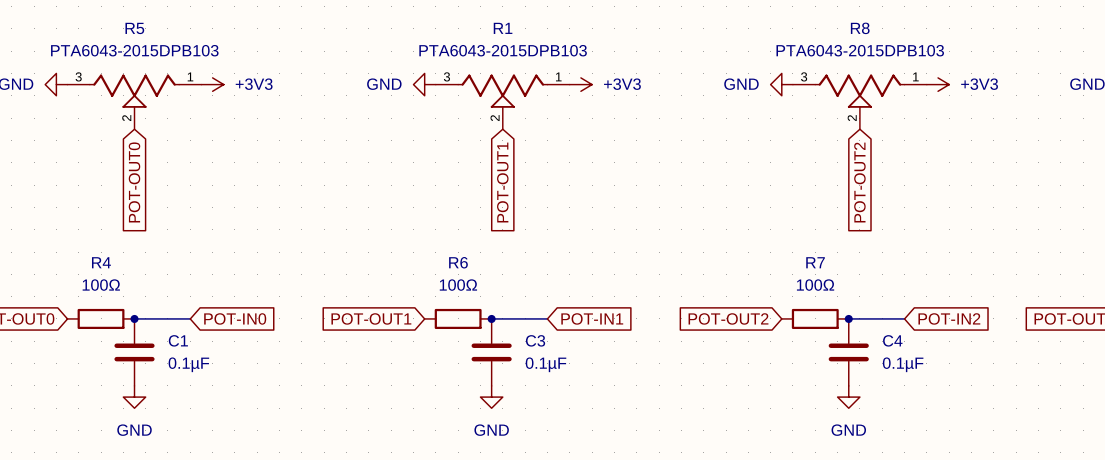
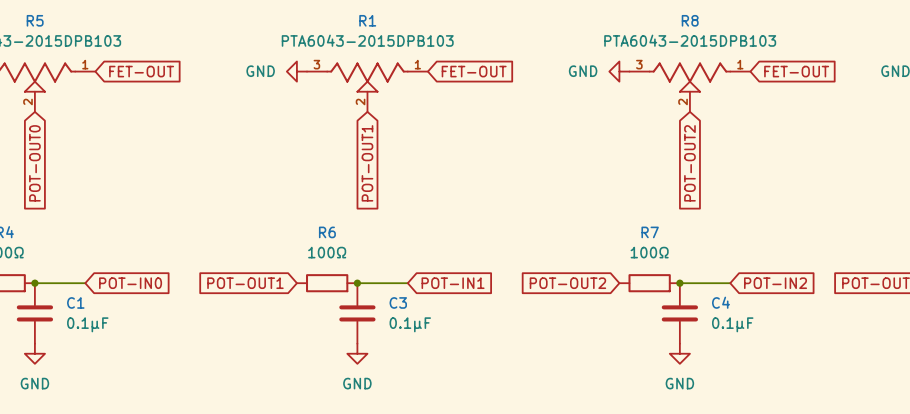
power symbol: +3V3 (212, 84) -> none
global label: none -> FET-OUT (141, 71)
power symbol: +3V3 (580, 84) -> none
global label: none -> FET-OUT (474, 71)
power symbol: +3V3 (938, 84) -> none
global label: none -> FET-OUT (796, 71)

